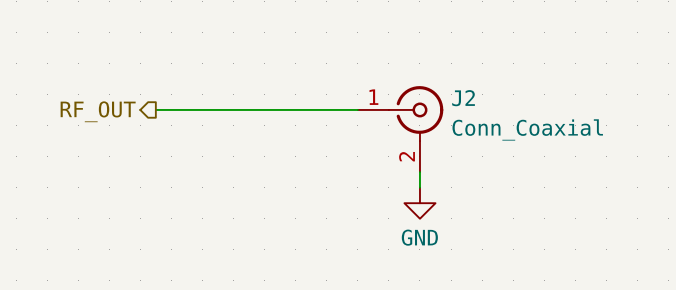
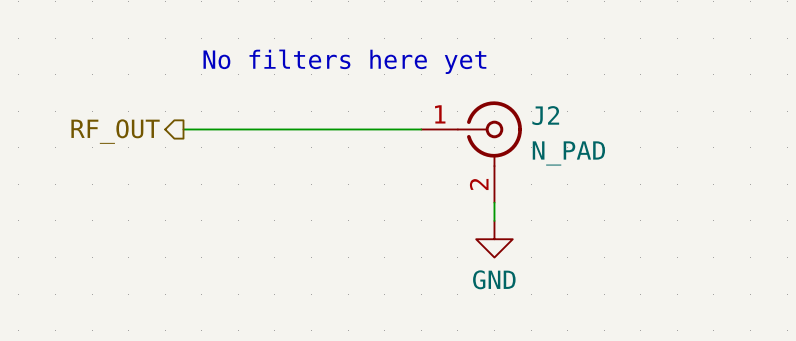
text: none -> No filters here yet (344, 61)
J2 value: Conn_Coaxial (527, 129) -> N_PAD (568, 153)

